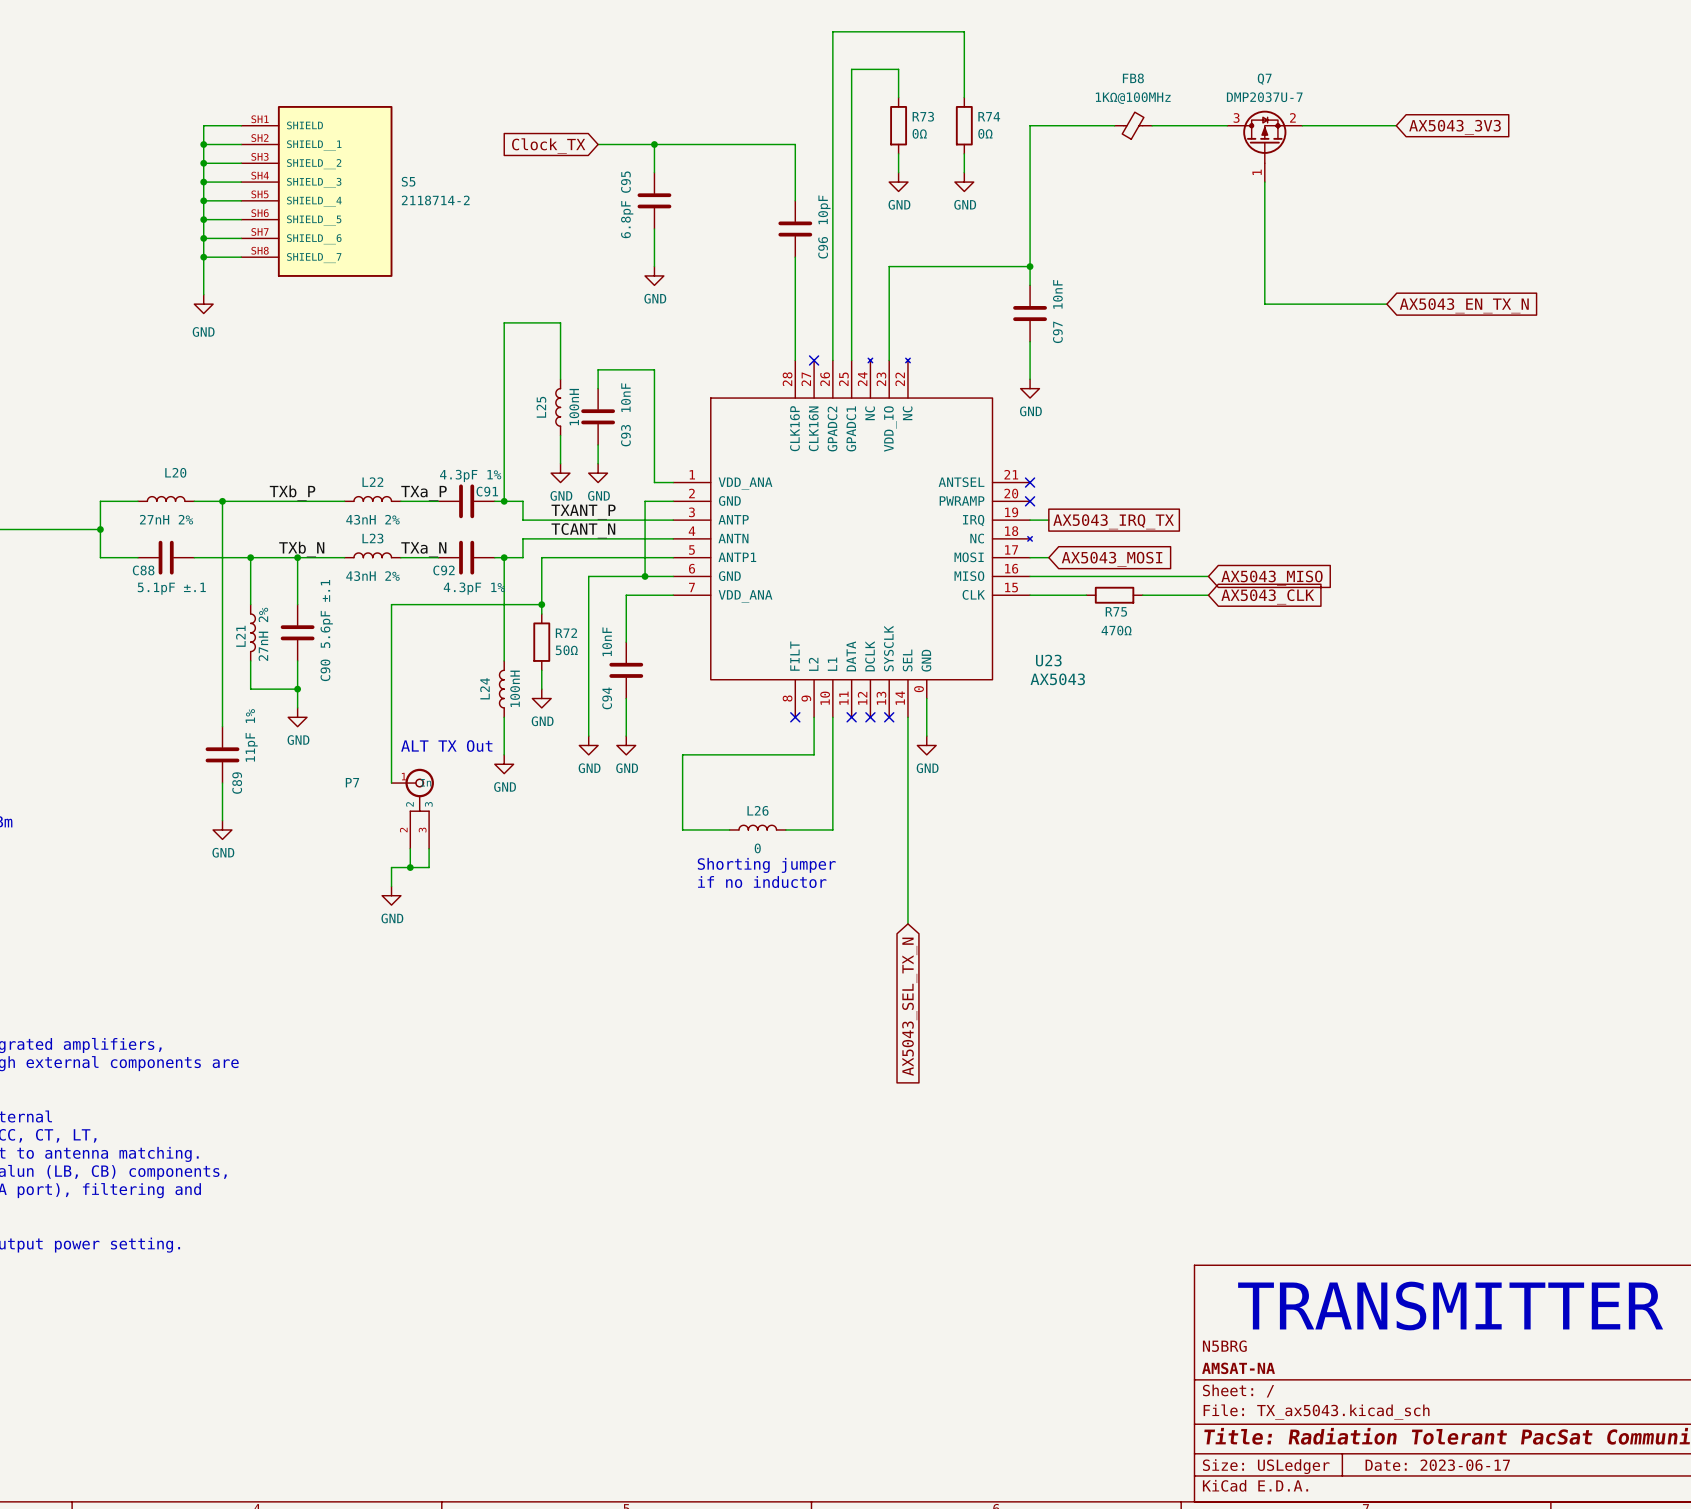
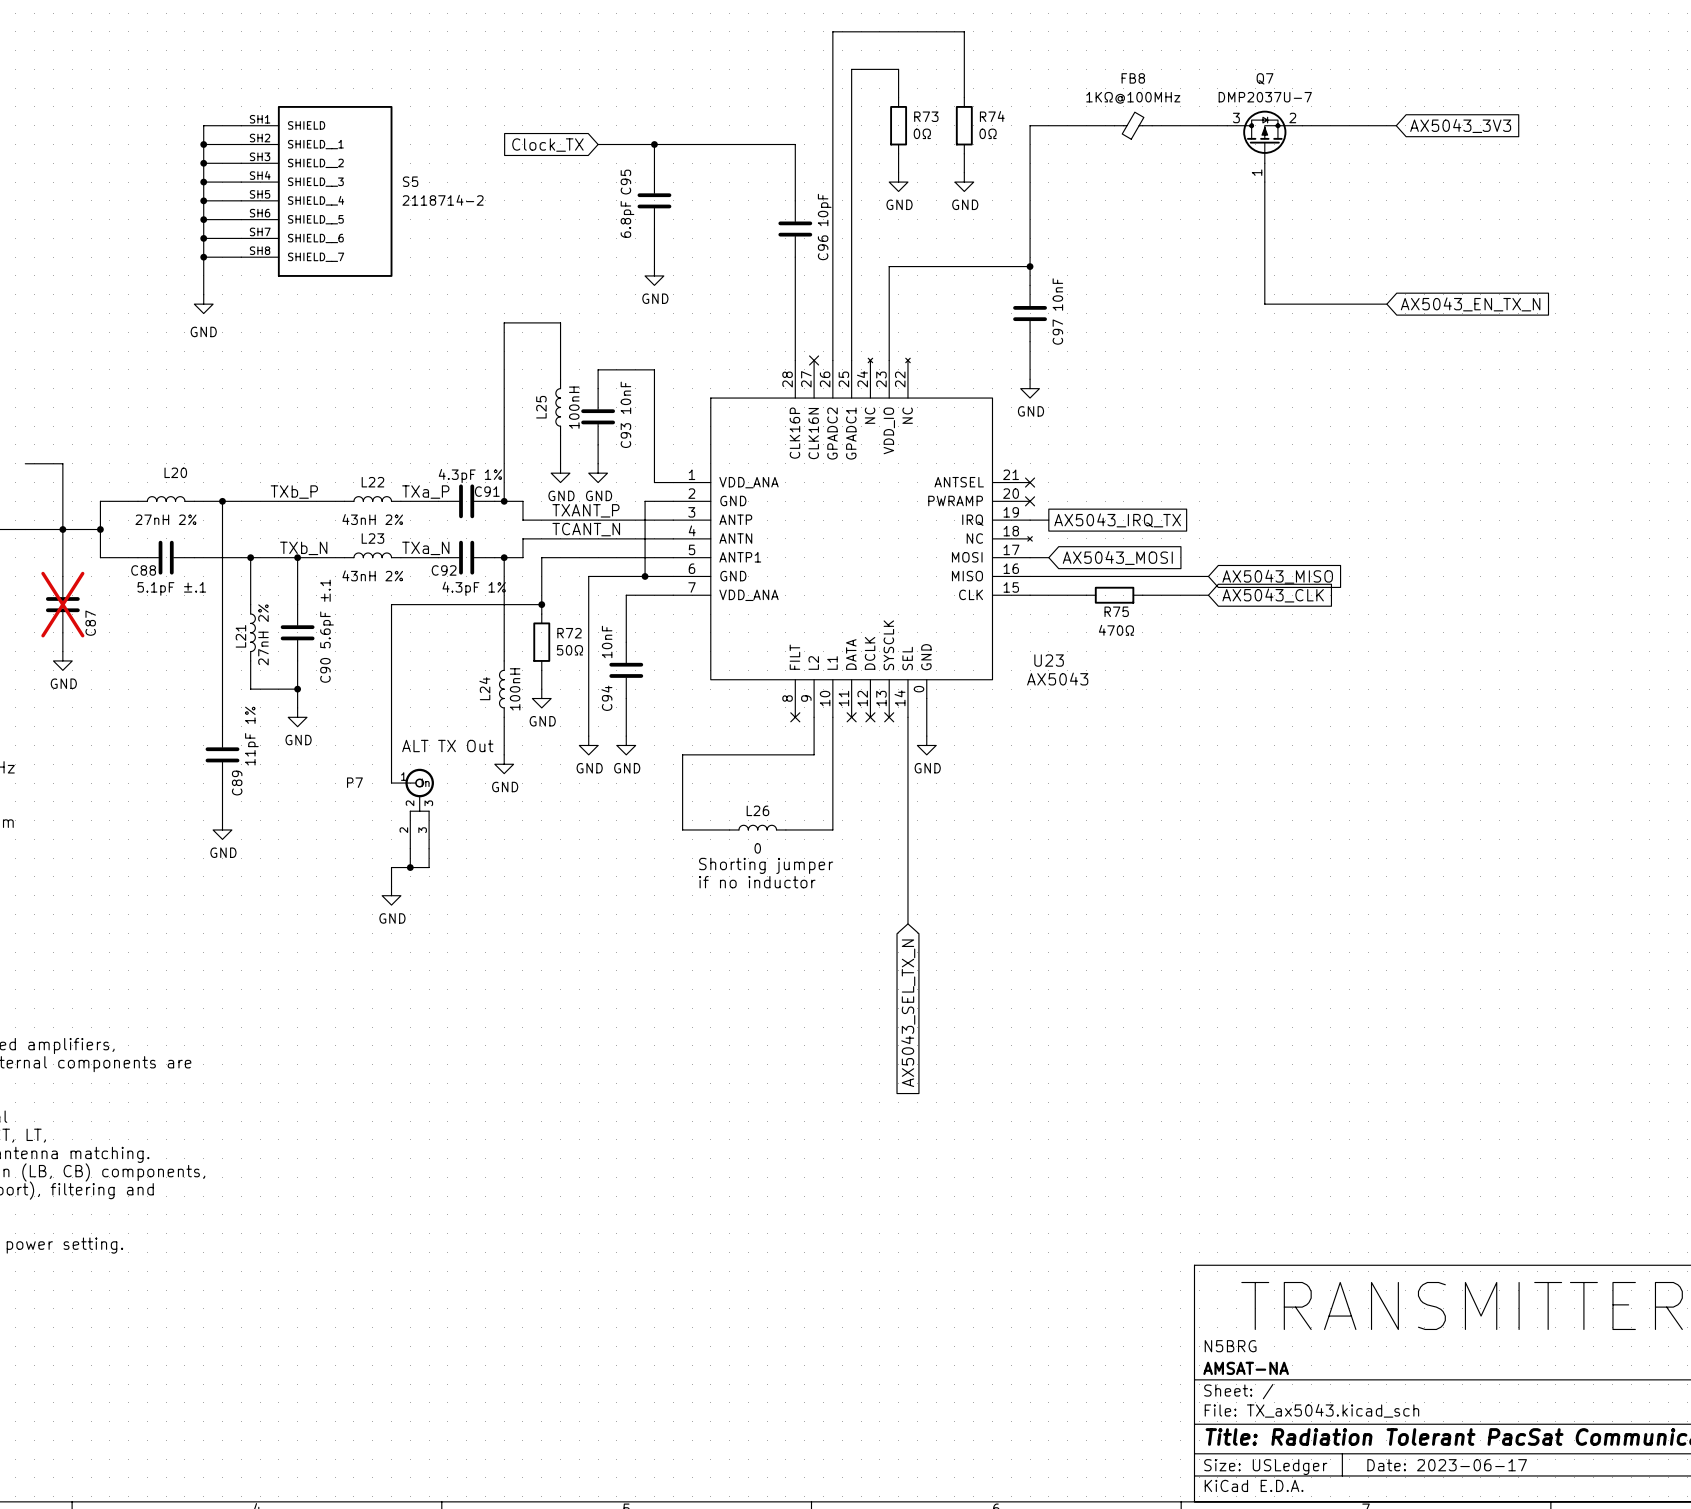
wire: none -> (25, 463) (62, 463) (62, 576)
junction: none -> (62, 529)
C87: none -> (62, 604)
wire: none -> (62, 632) (62, 651)
power symbol: none -> GND (62, 660)

